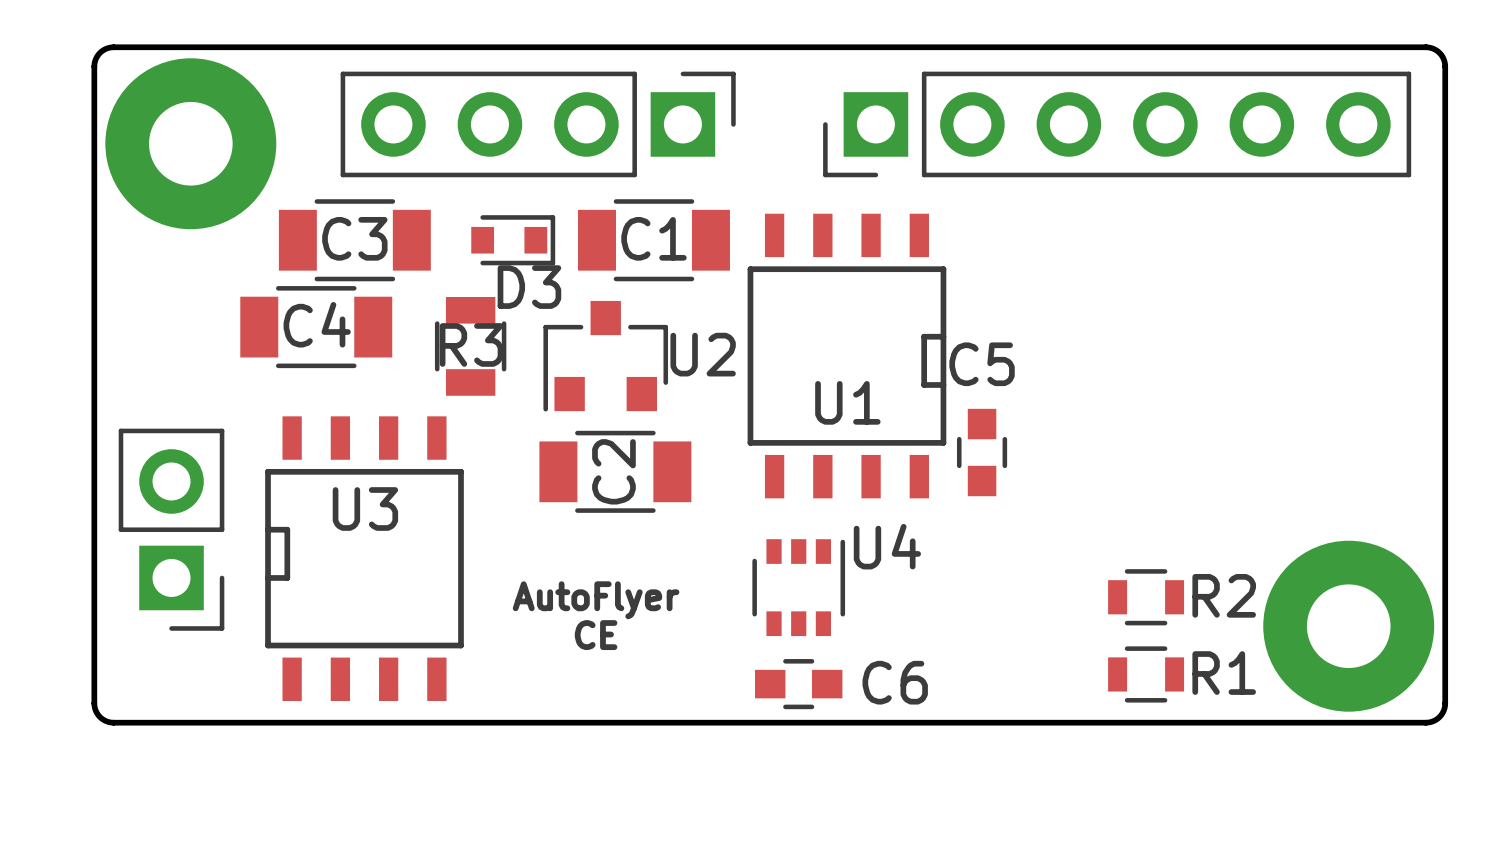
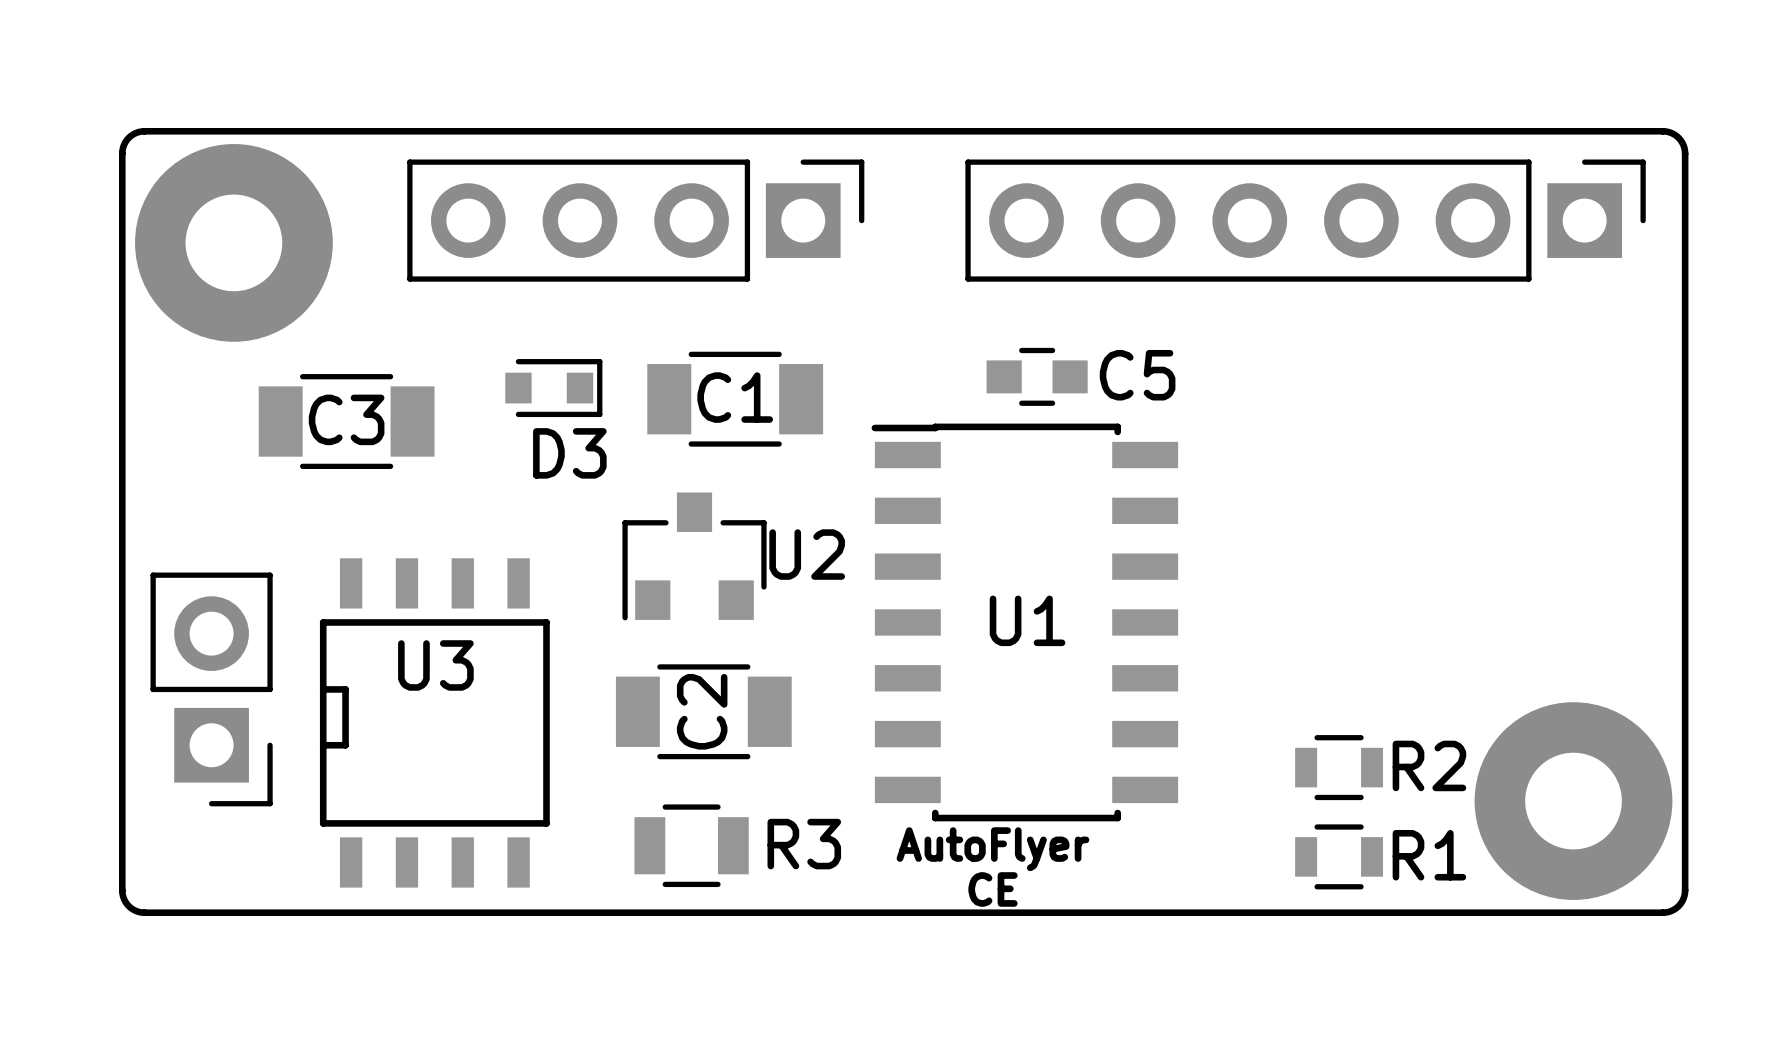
part rotation: 0° (1117, 124) -> 180° (1305, 220)
U1 footprint: [747, 213, 947, 499] -> [871, 423, 1179, 822]
C3 position: (354, 240) -> (346, 421)
D3 position: (513, 240) -> (553, 388)
C1 position: (653, 240) -> (735, 399)
D3 name position: D3 (529, 287) -> D3 (569, 453)
C4: (316, 327) -> none
R3 name position: R3 (471, 344) -> R3 (804, 844)
R3 rotation: 0° (470, 346) -> 90° clockwise (691, 845)
R3 position: (470, 346) -> (691, 845)
U2 position: (605, 356) -> (694, 556)
C5 rotation: 0° (982, 452) -> 90° clockwise (1037, 376)
C5 position: (982, 452) -> (1037, 376)
C2 position: (615, 471) -> (703, 711)
U4: (798, 587) -> none
text position: AutoFlyer (596, 600) -> AutoFlyer (993, 849)
text position: CE (596, 635) -> CE (993, 889)
C6: (798, 684) -> none

